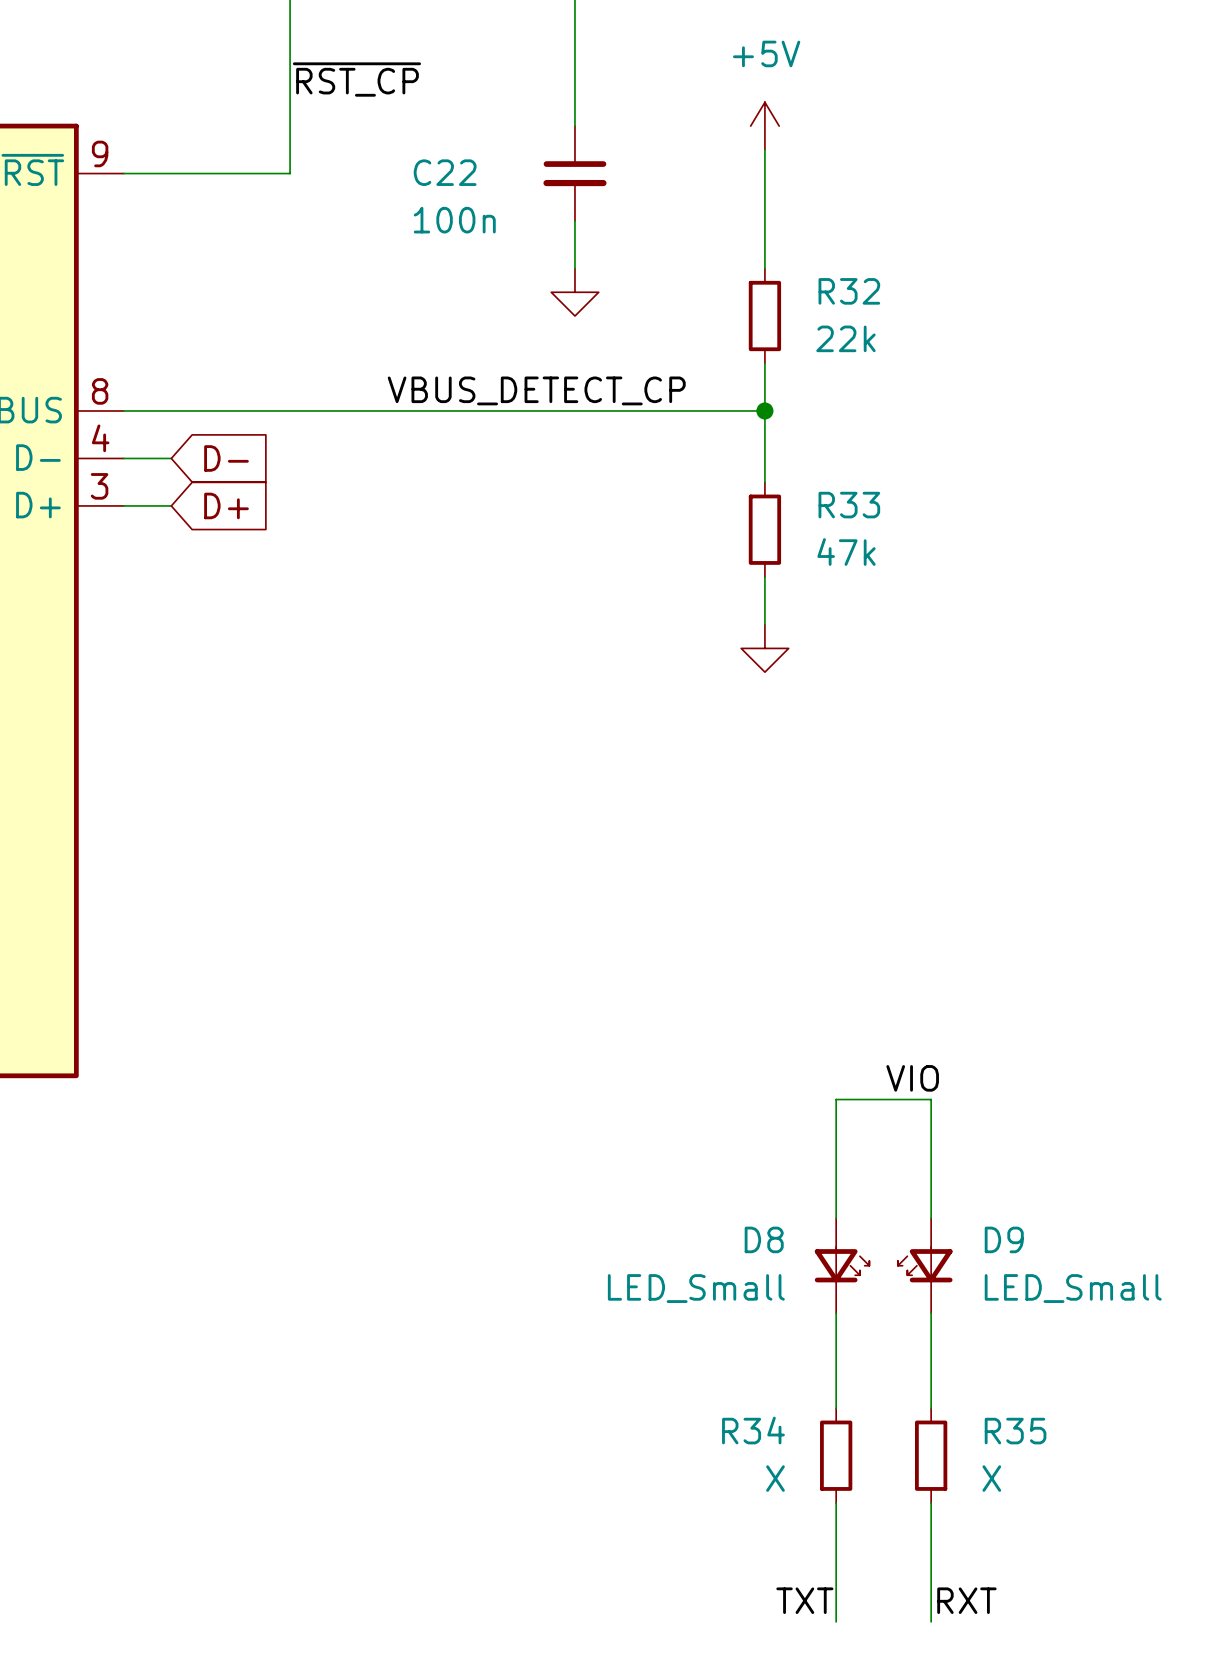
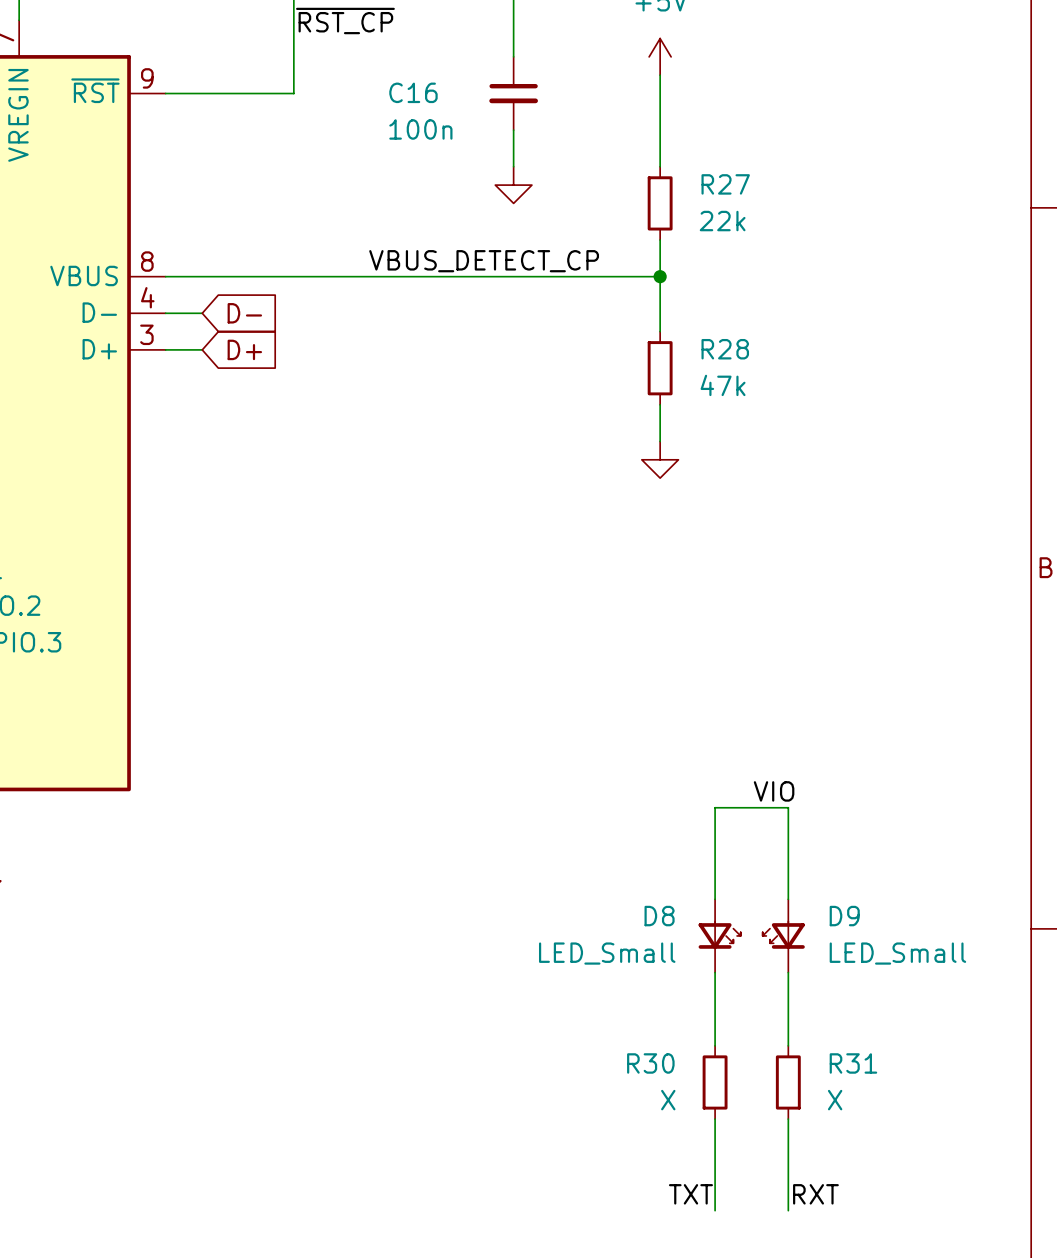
C22 name: C22 (445, 172) -> C16 (413, 92)
R32 name: R32 (849, 291) -> R27 (725, 184)
R33 name: R33 (849, 505) -> R28 (725, 349)
R34 name: R34 (753, 1430) -> R30 (650, 1063)
R35 name: R35 (1015, 1431) -> R31 (853, 1063)

